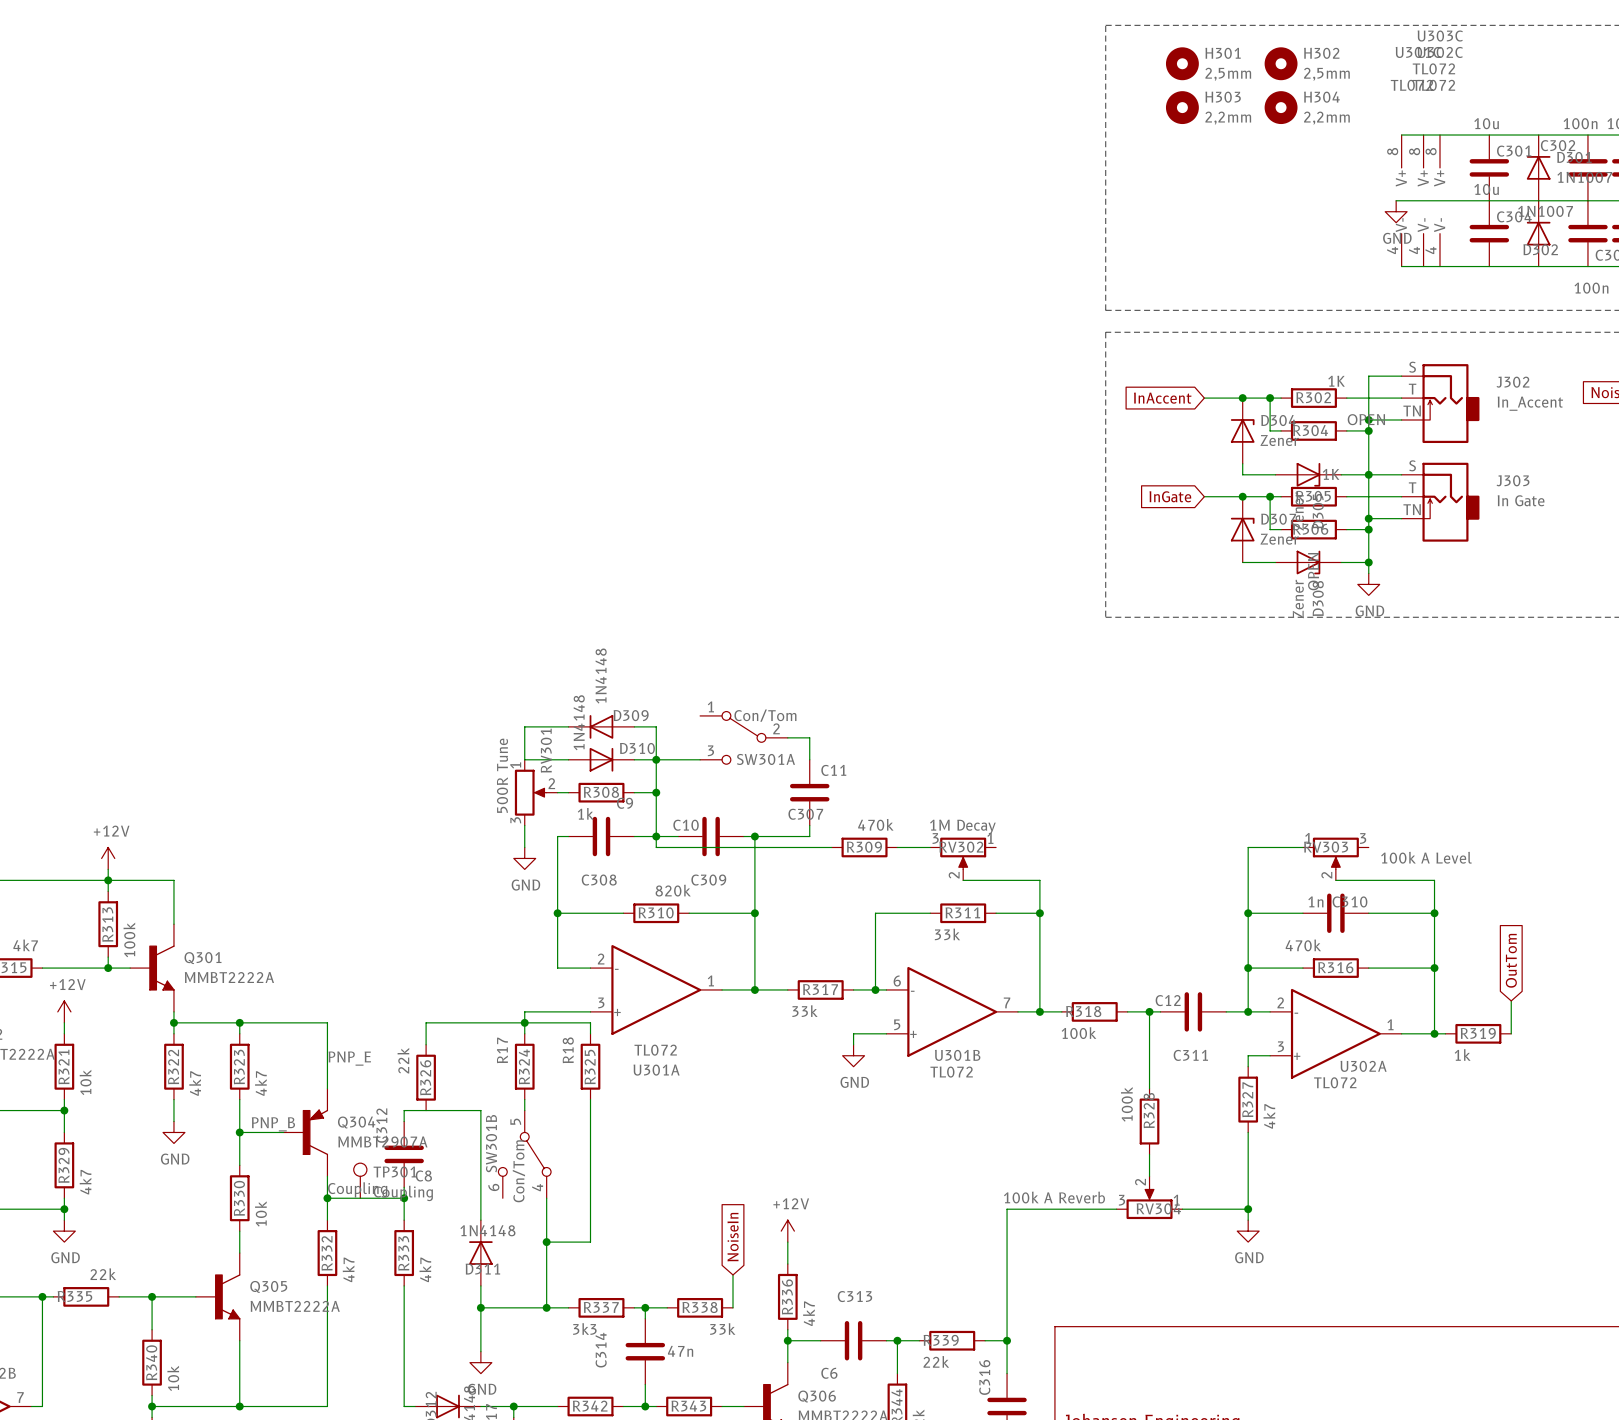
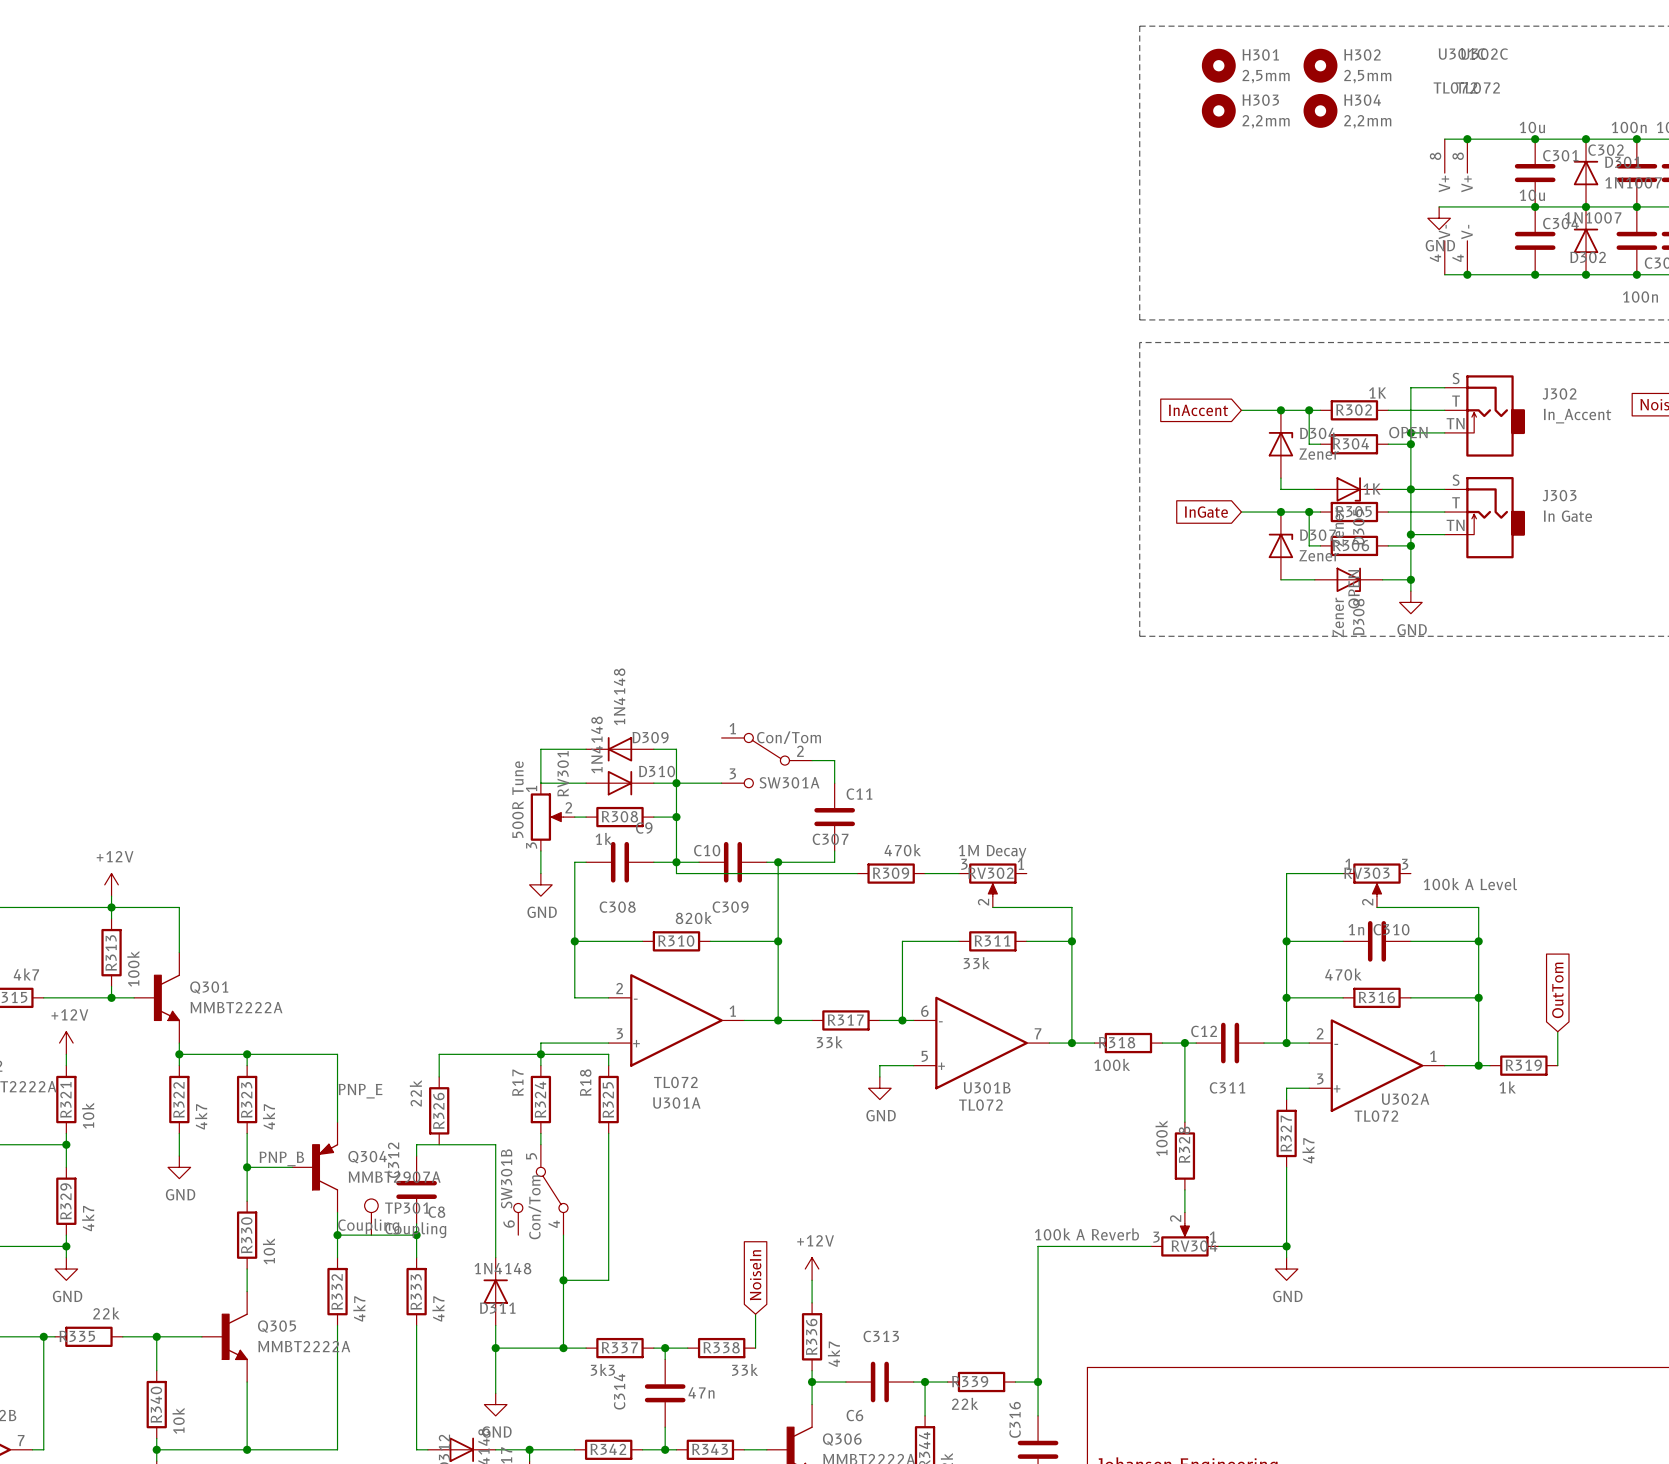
junction: none -> (1467, 139)
junction: none -> (1535, 139)
junction: none -> (1586, 139)
junction: none -> (1636, 139)
U303C: TL072 (1440, 200) -> none
junction: none -> (1535, 206)
junction: none -> (1586, 206)
junction: none -> (1636, 206)
junction: none -> (1467, 274)
junction: none -> (1535, 274)
junction: none -> (1586, 274)
junction: none -> (1636, 274)

